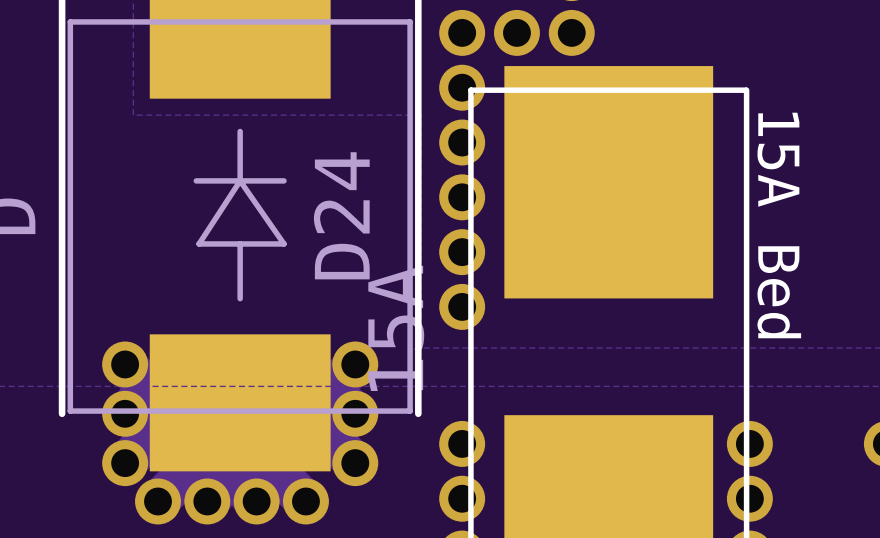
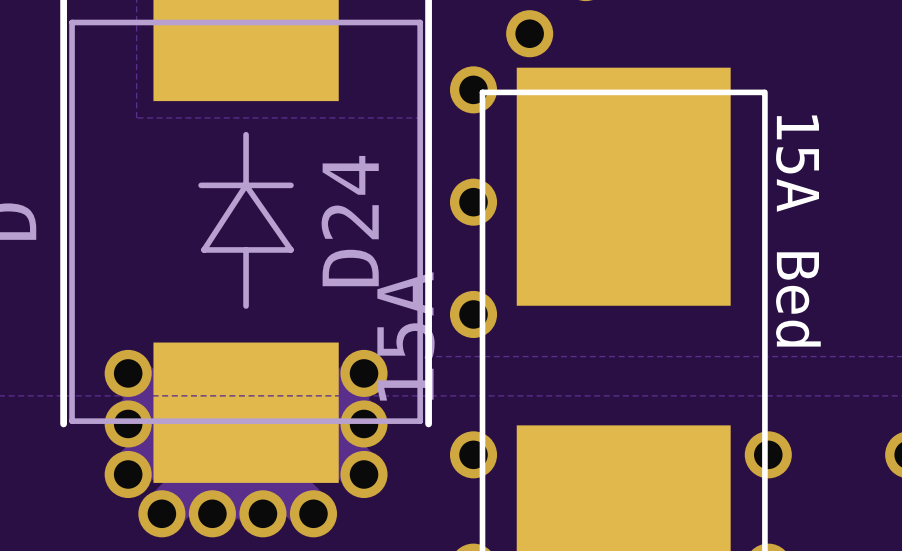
via: (462, 32) -> none
via: (571, 32) -> none
via: (462, 142) -> none
via: (462, 252) -> none
via: (462, 498) -> none
via: (749, 498) -> none

